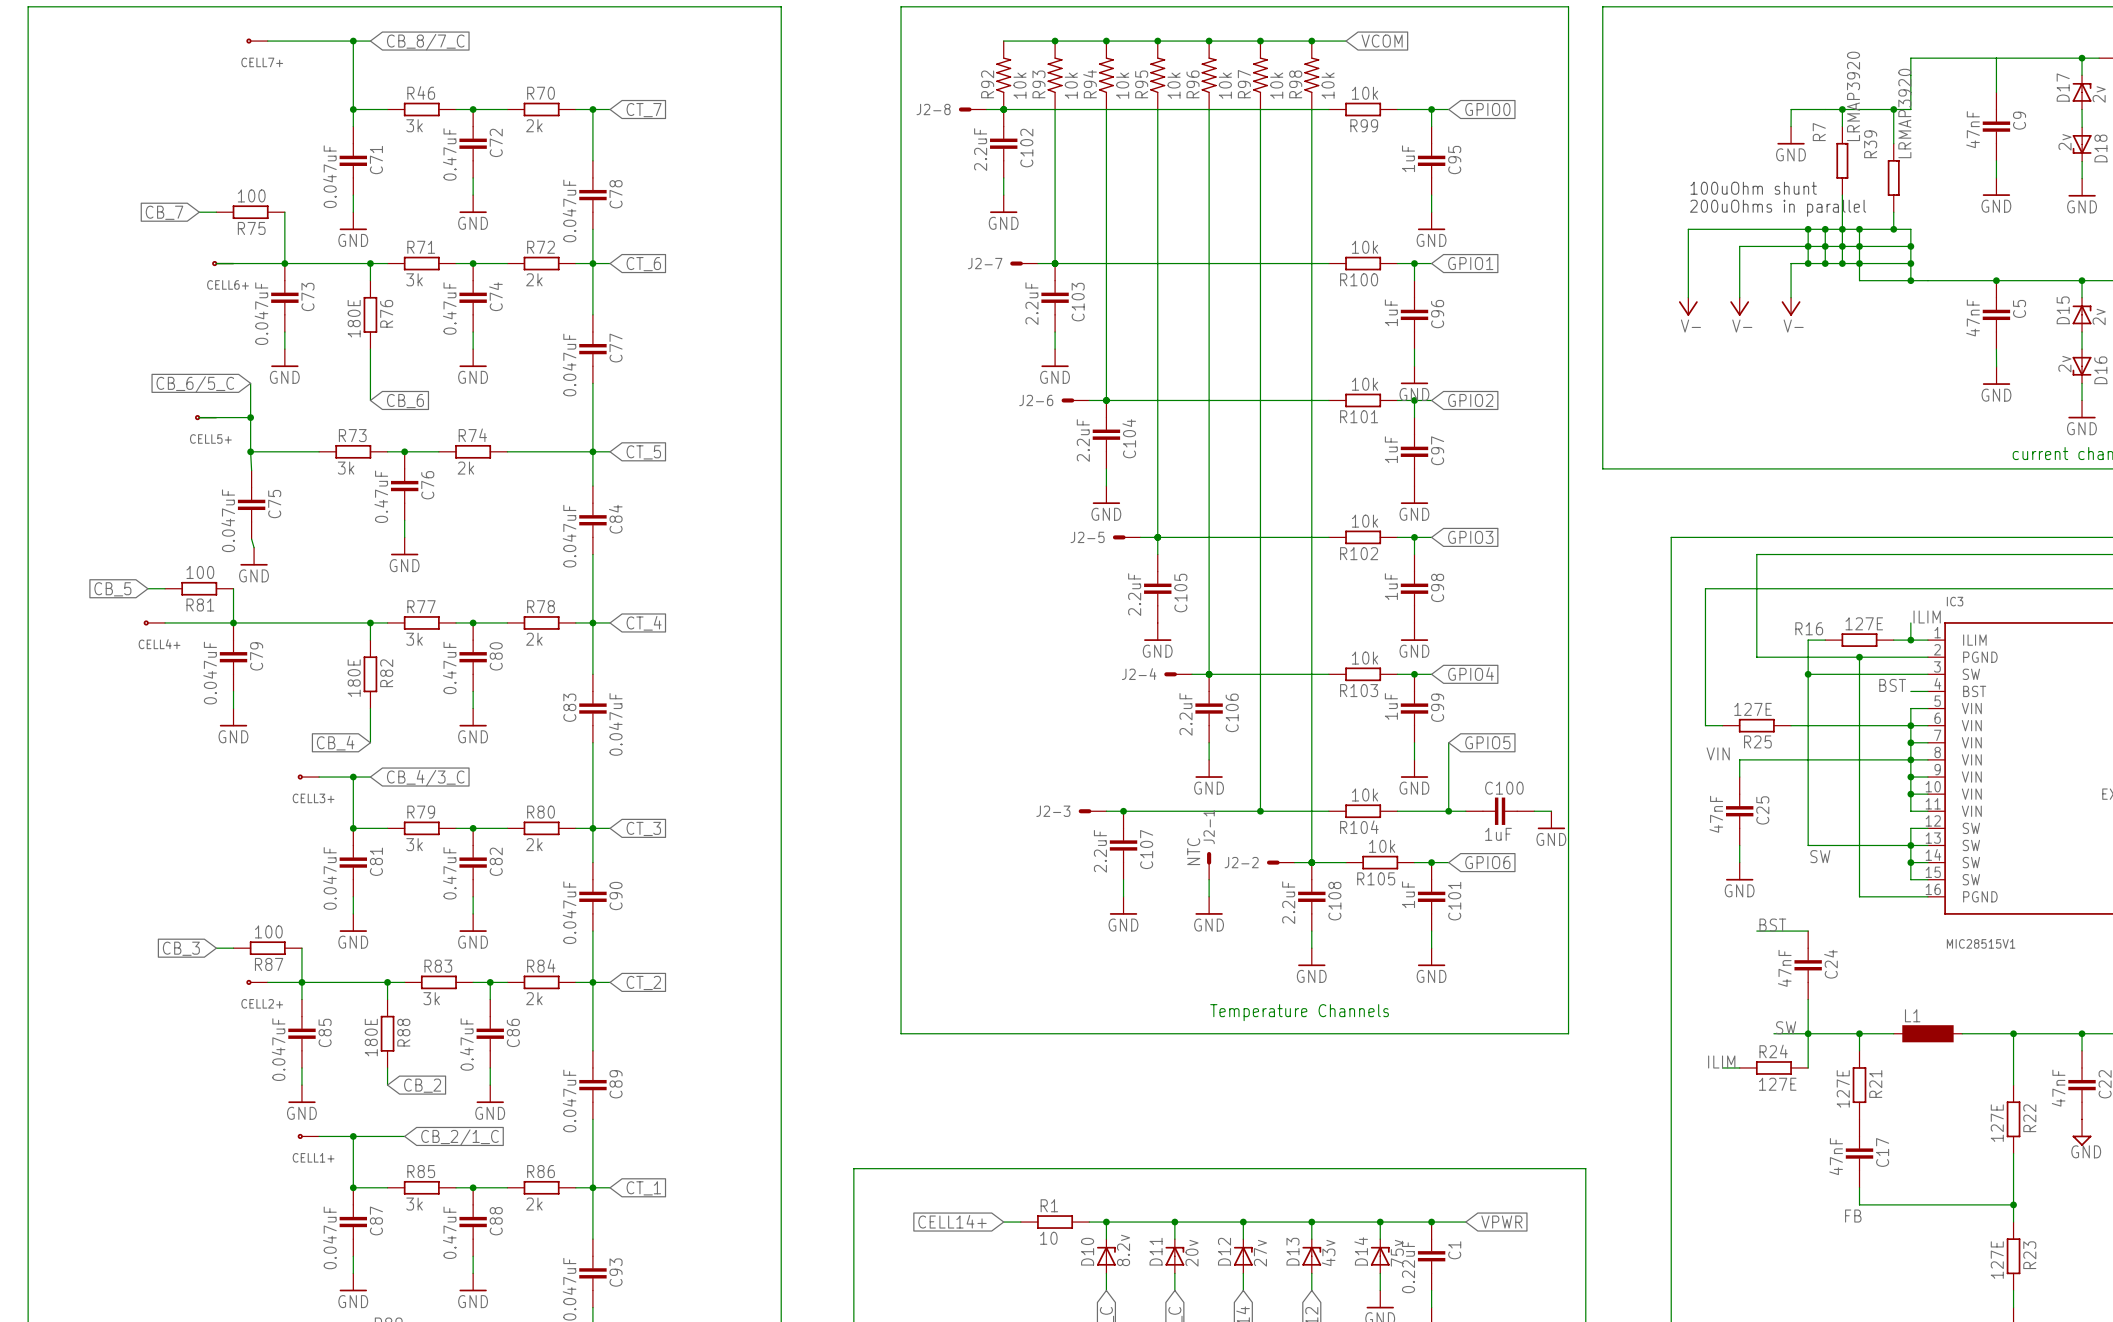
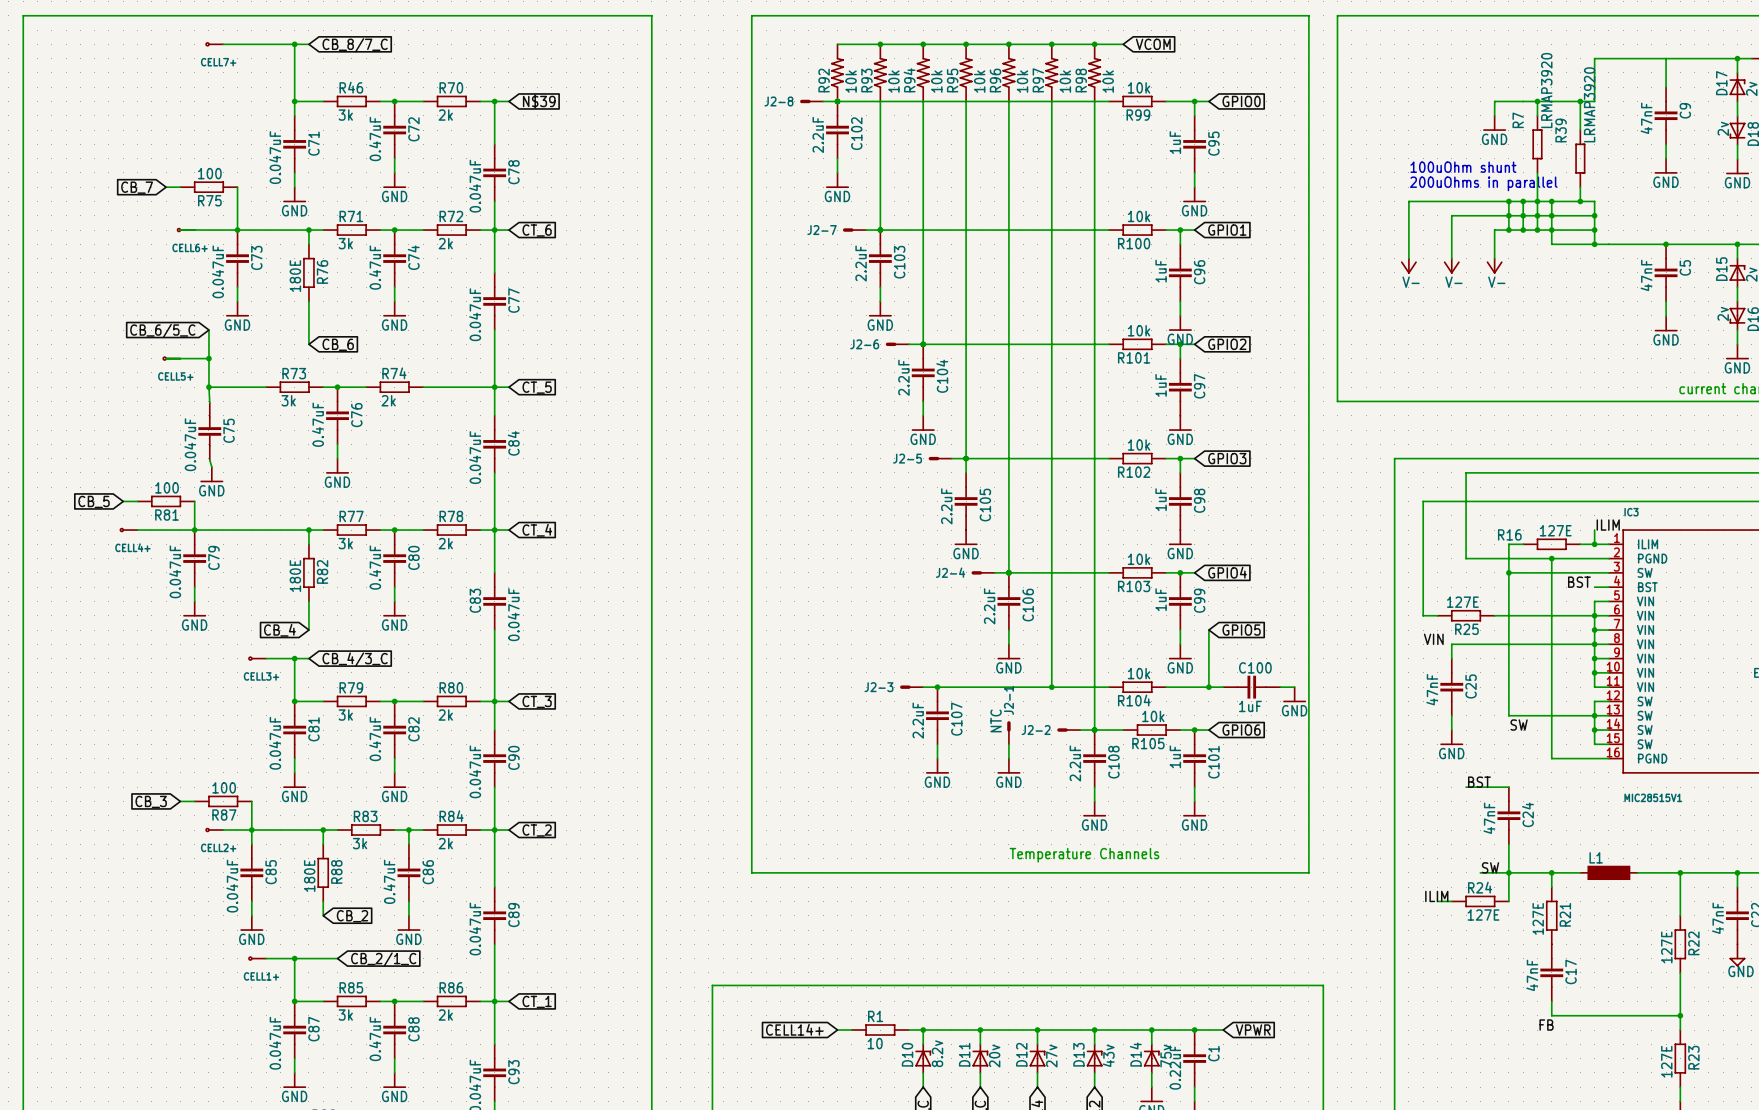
global label: CT_7 (644, 110) -> N$39 (539, 101)

